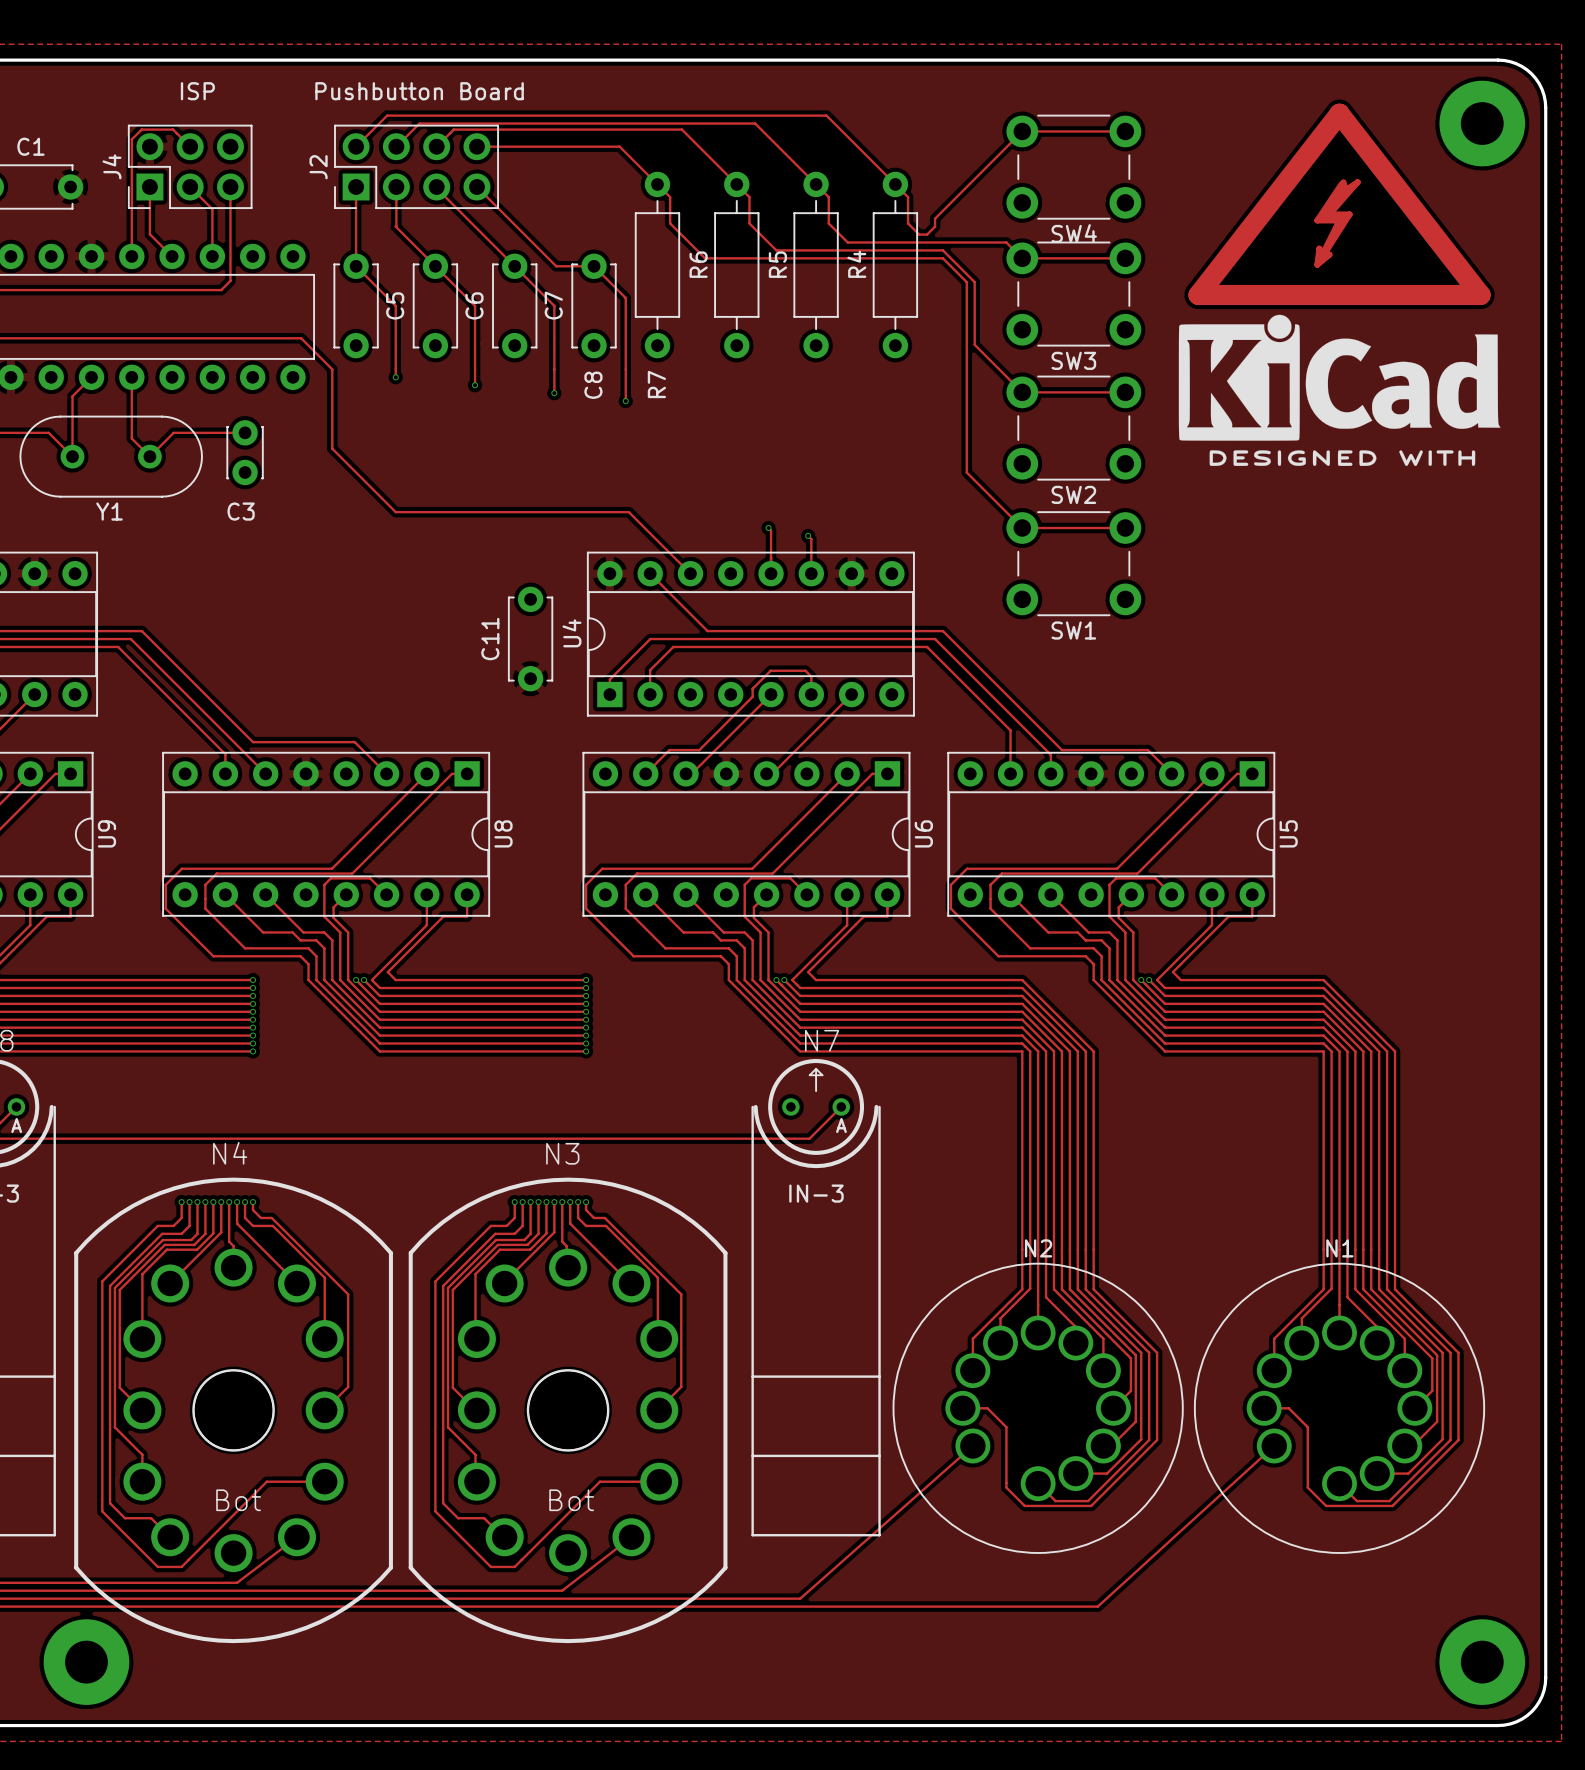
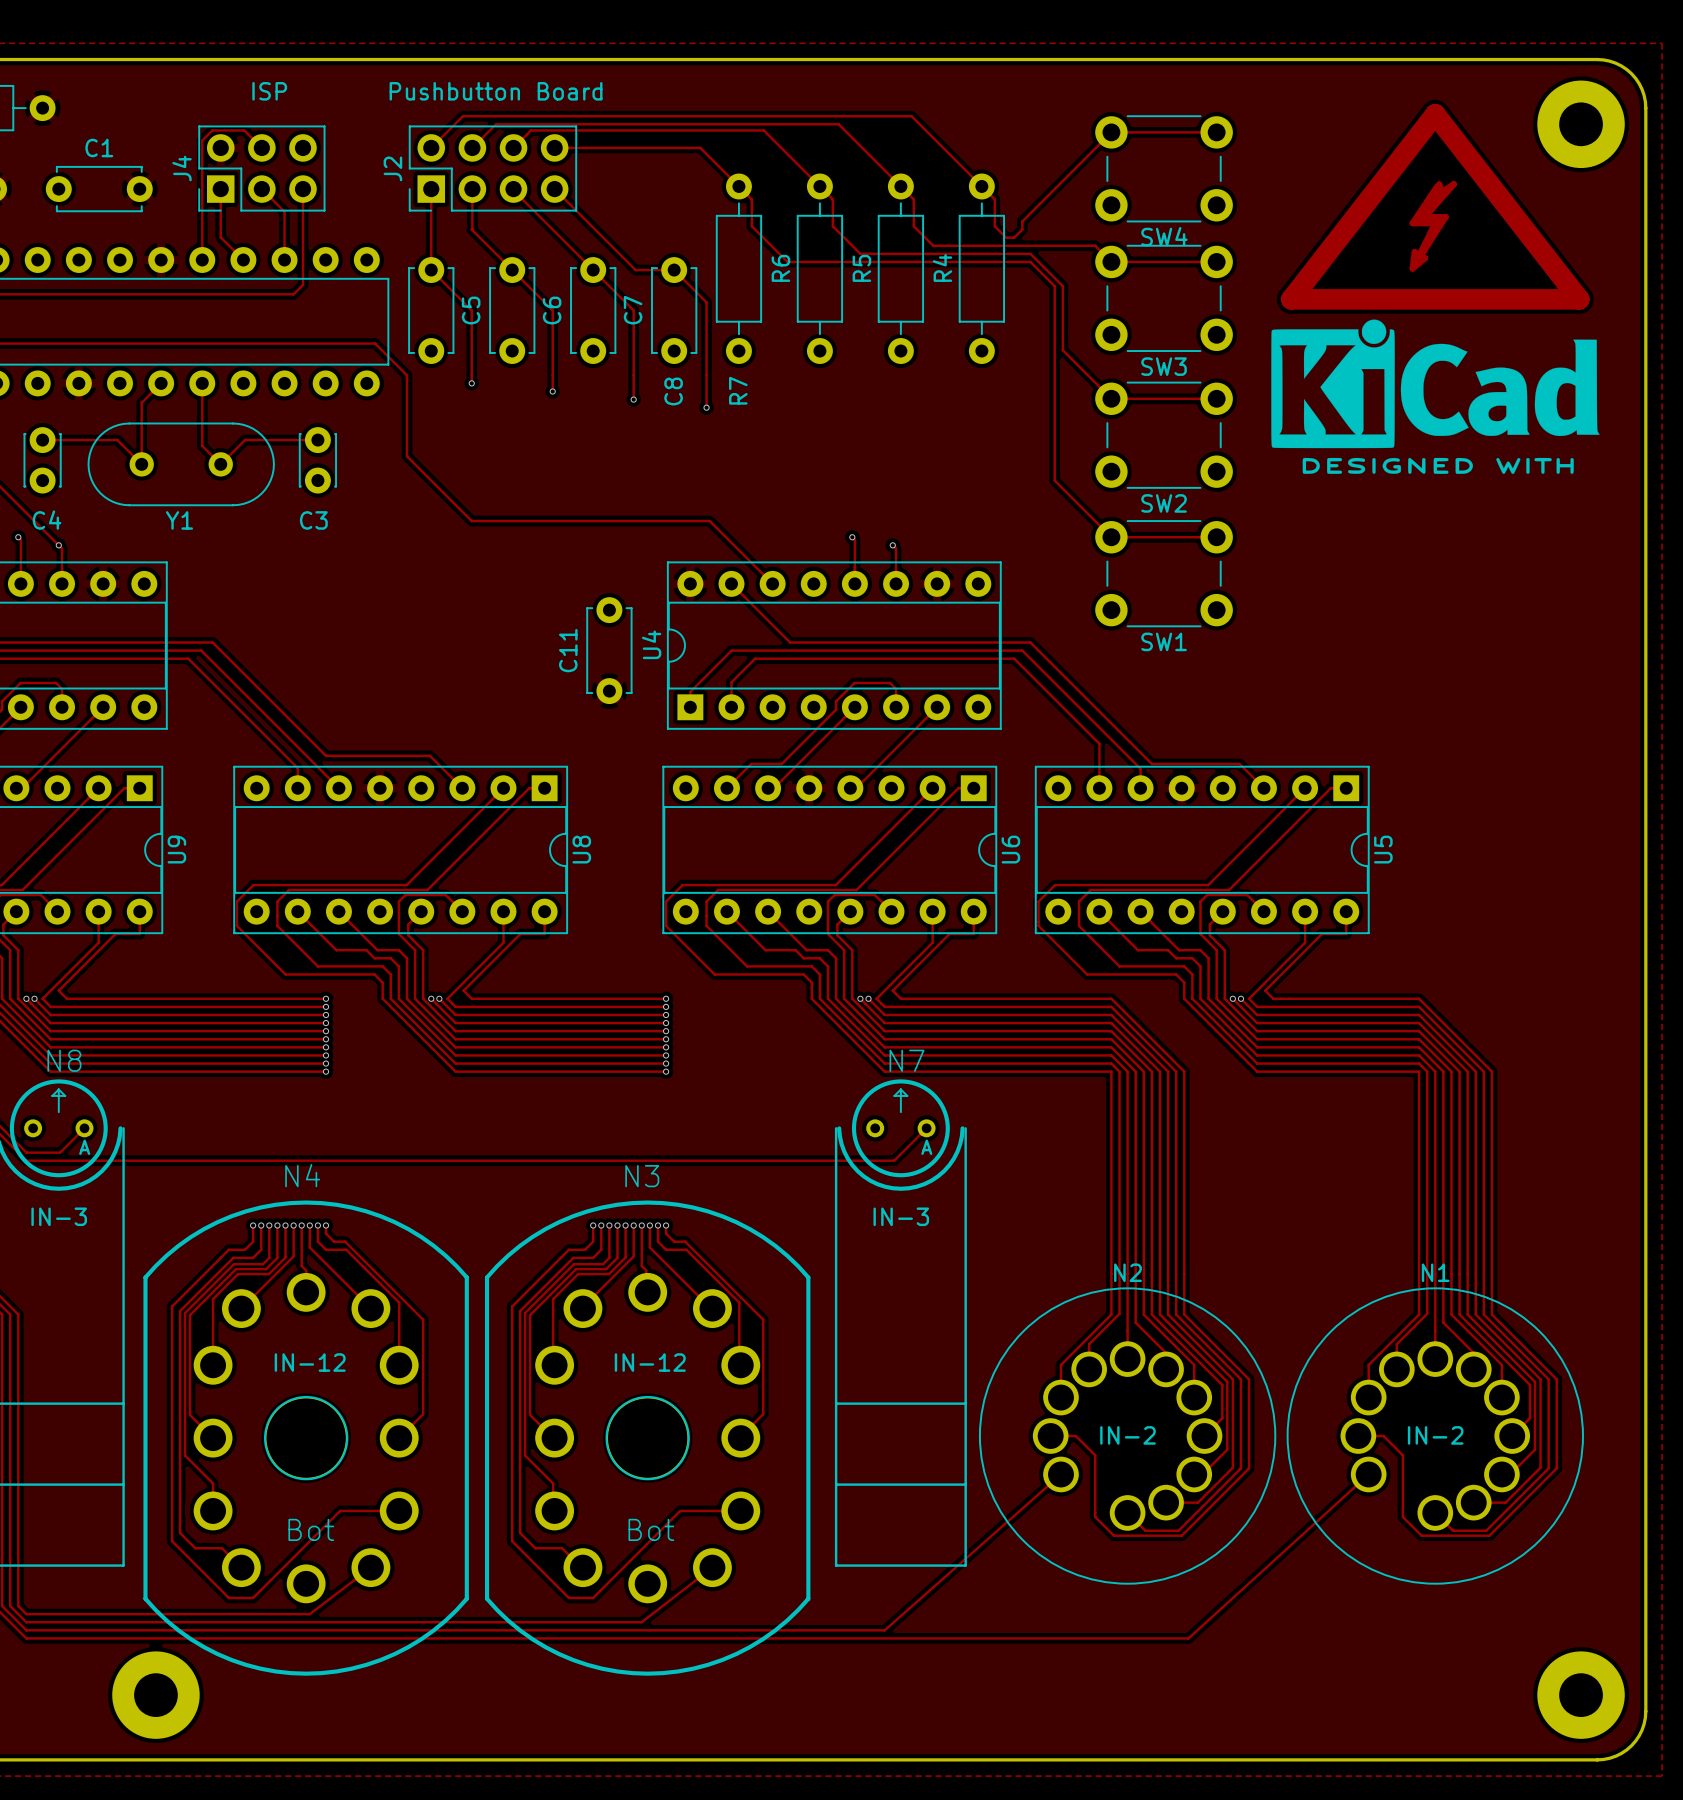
text: none -> IN-12 (310, 1362)
text: none -> IN-12 (650, 1362)
text: none -> IN-2 (1127, 1435)
text: none -> IN-2 (1435, 1435)

